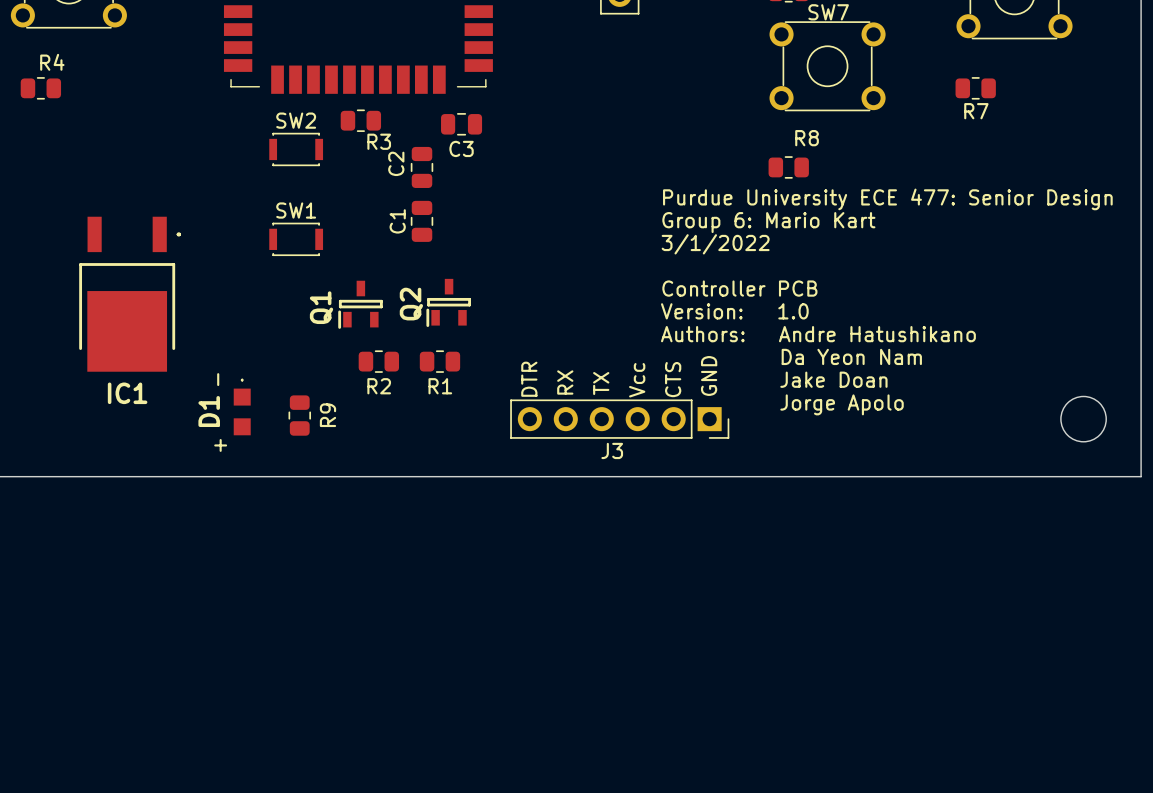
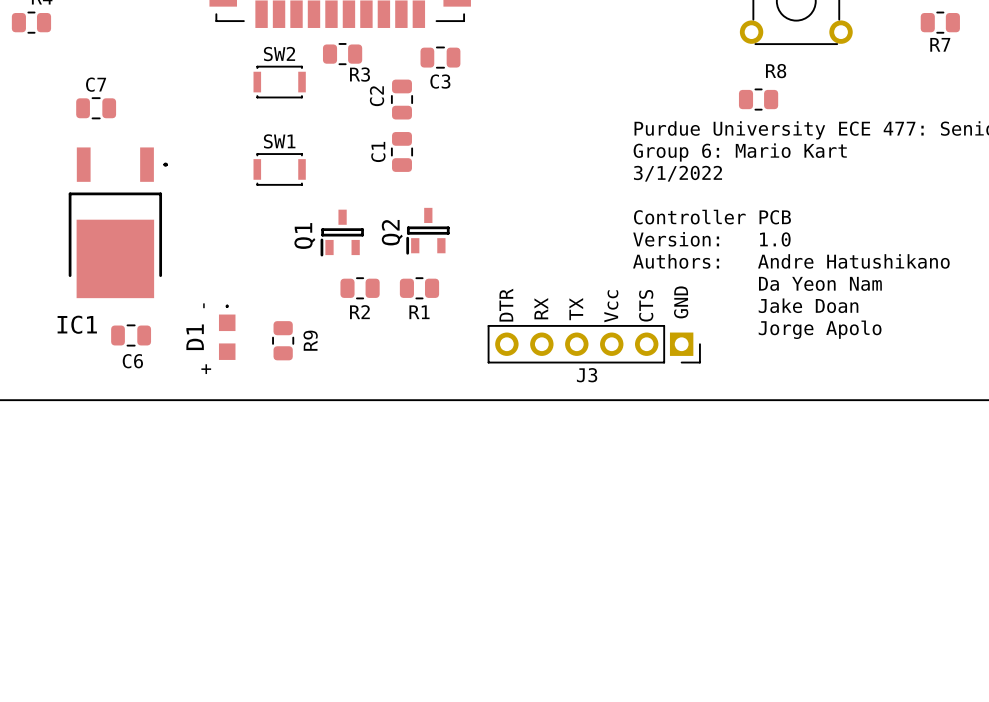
C7: none -> (96, 108)
IC1 name position: IC1 (127, 393) -> IC1 (77, 324)
C6: none -> (131, 335)

